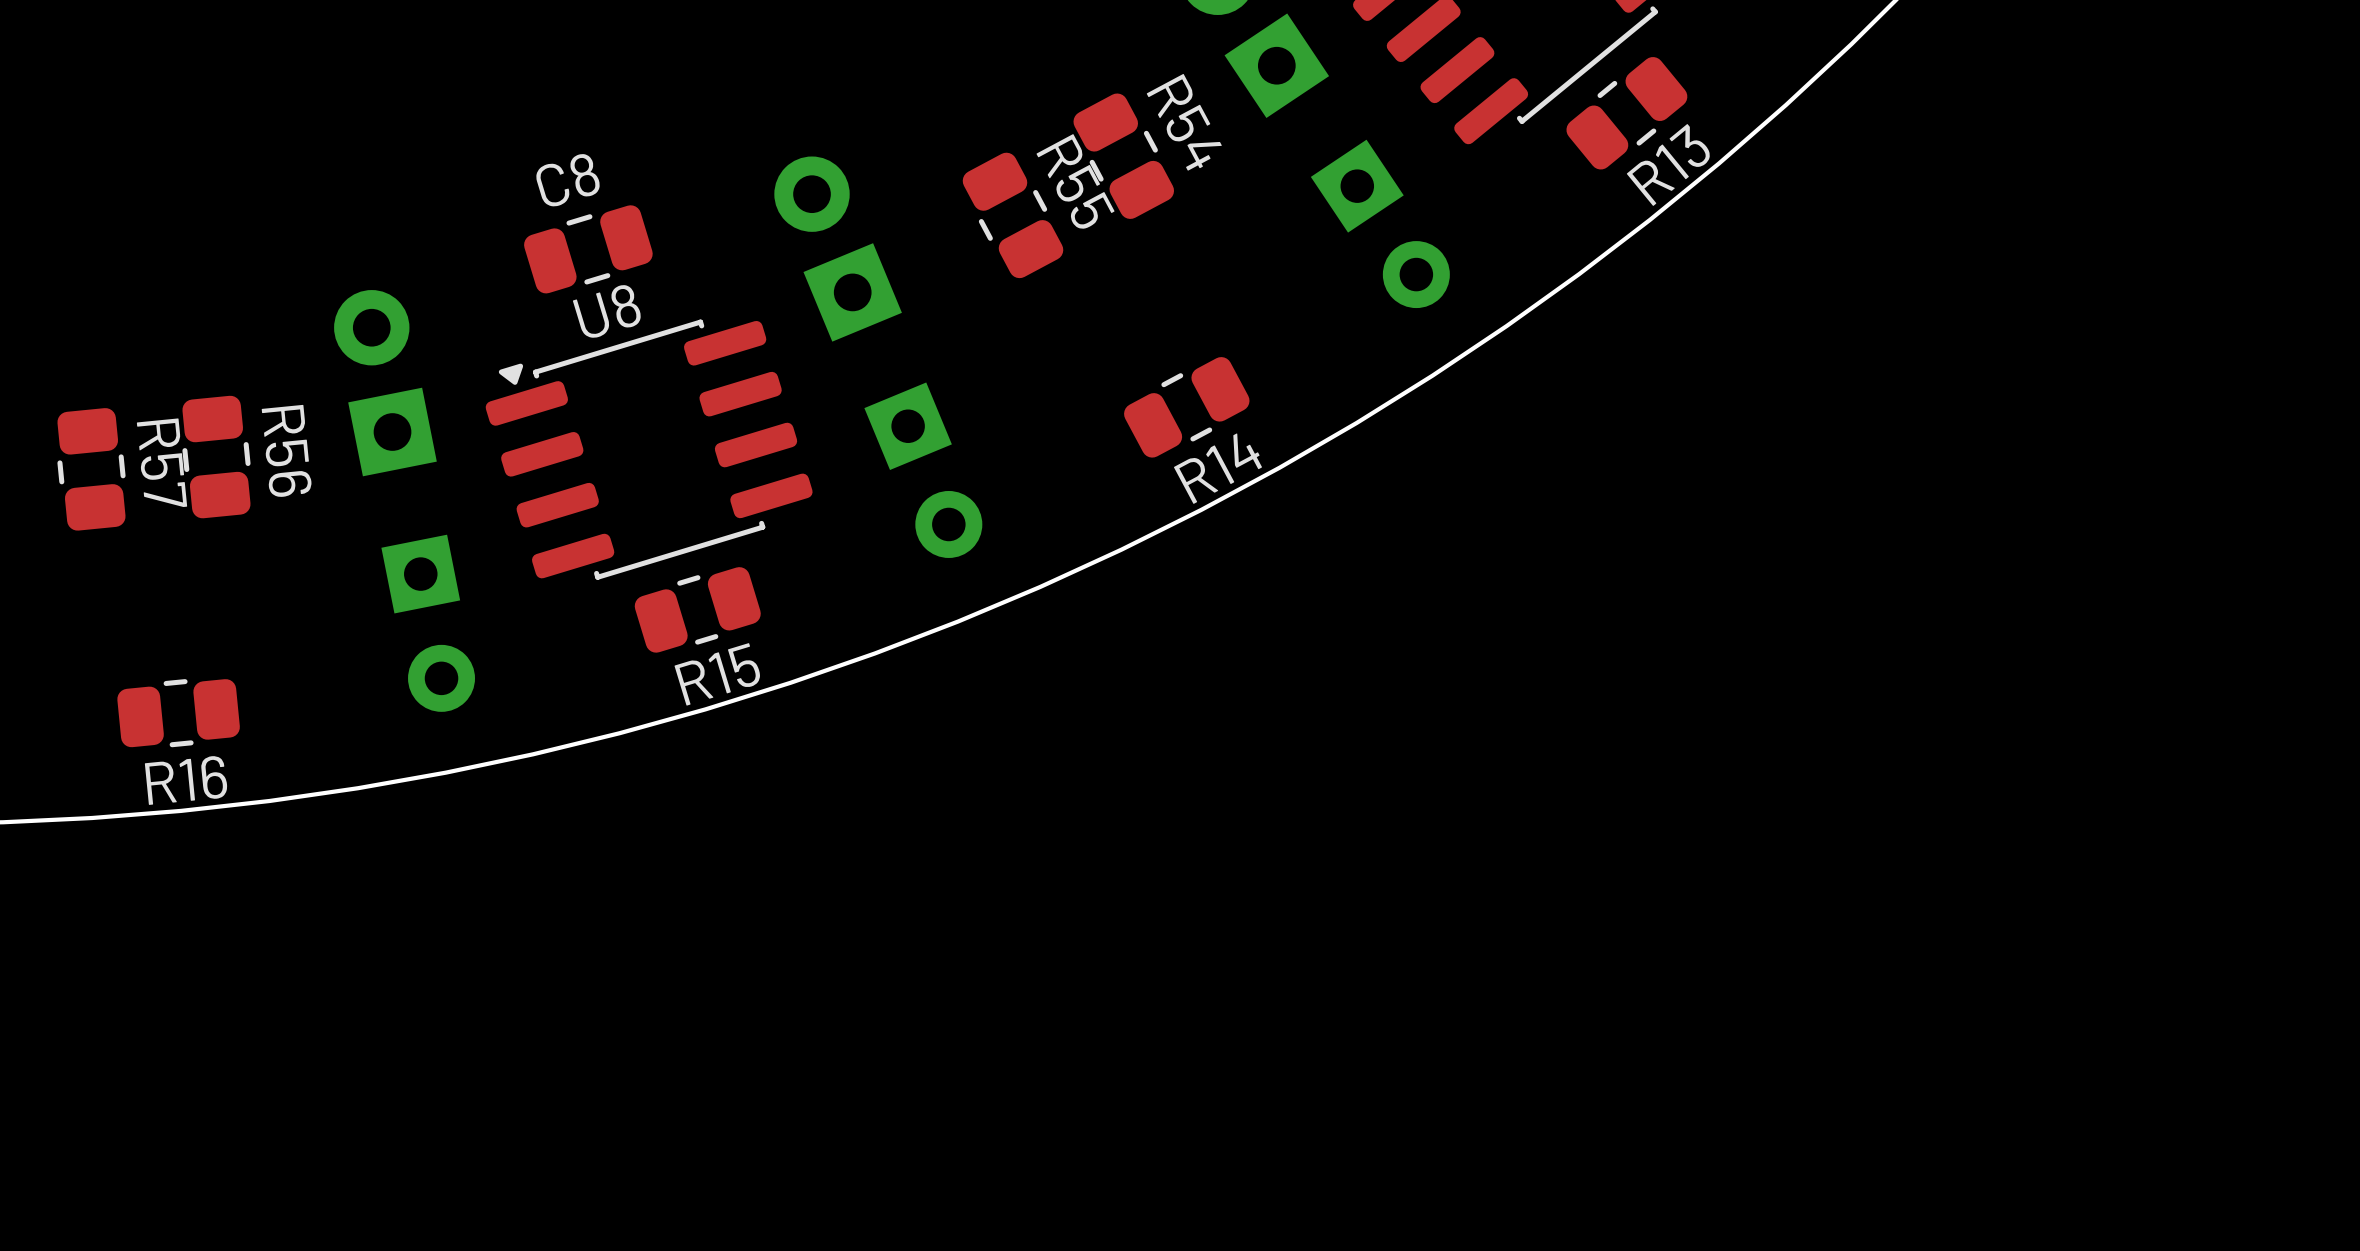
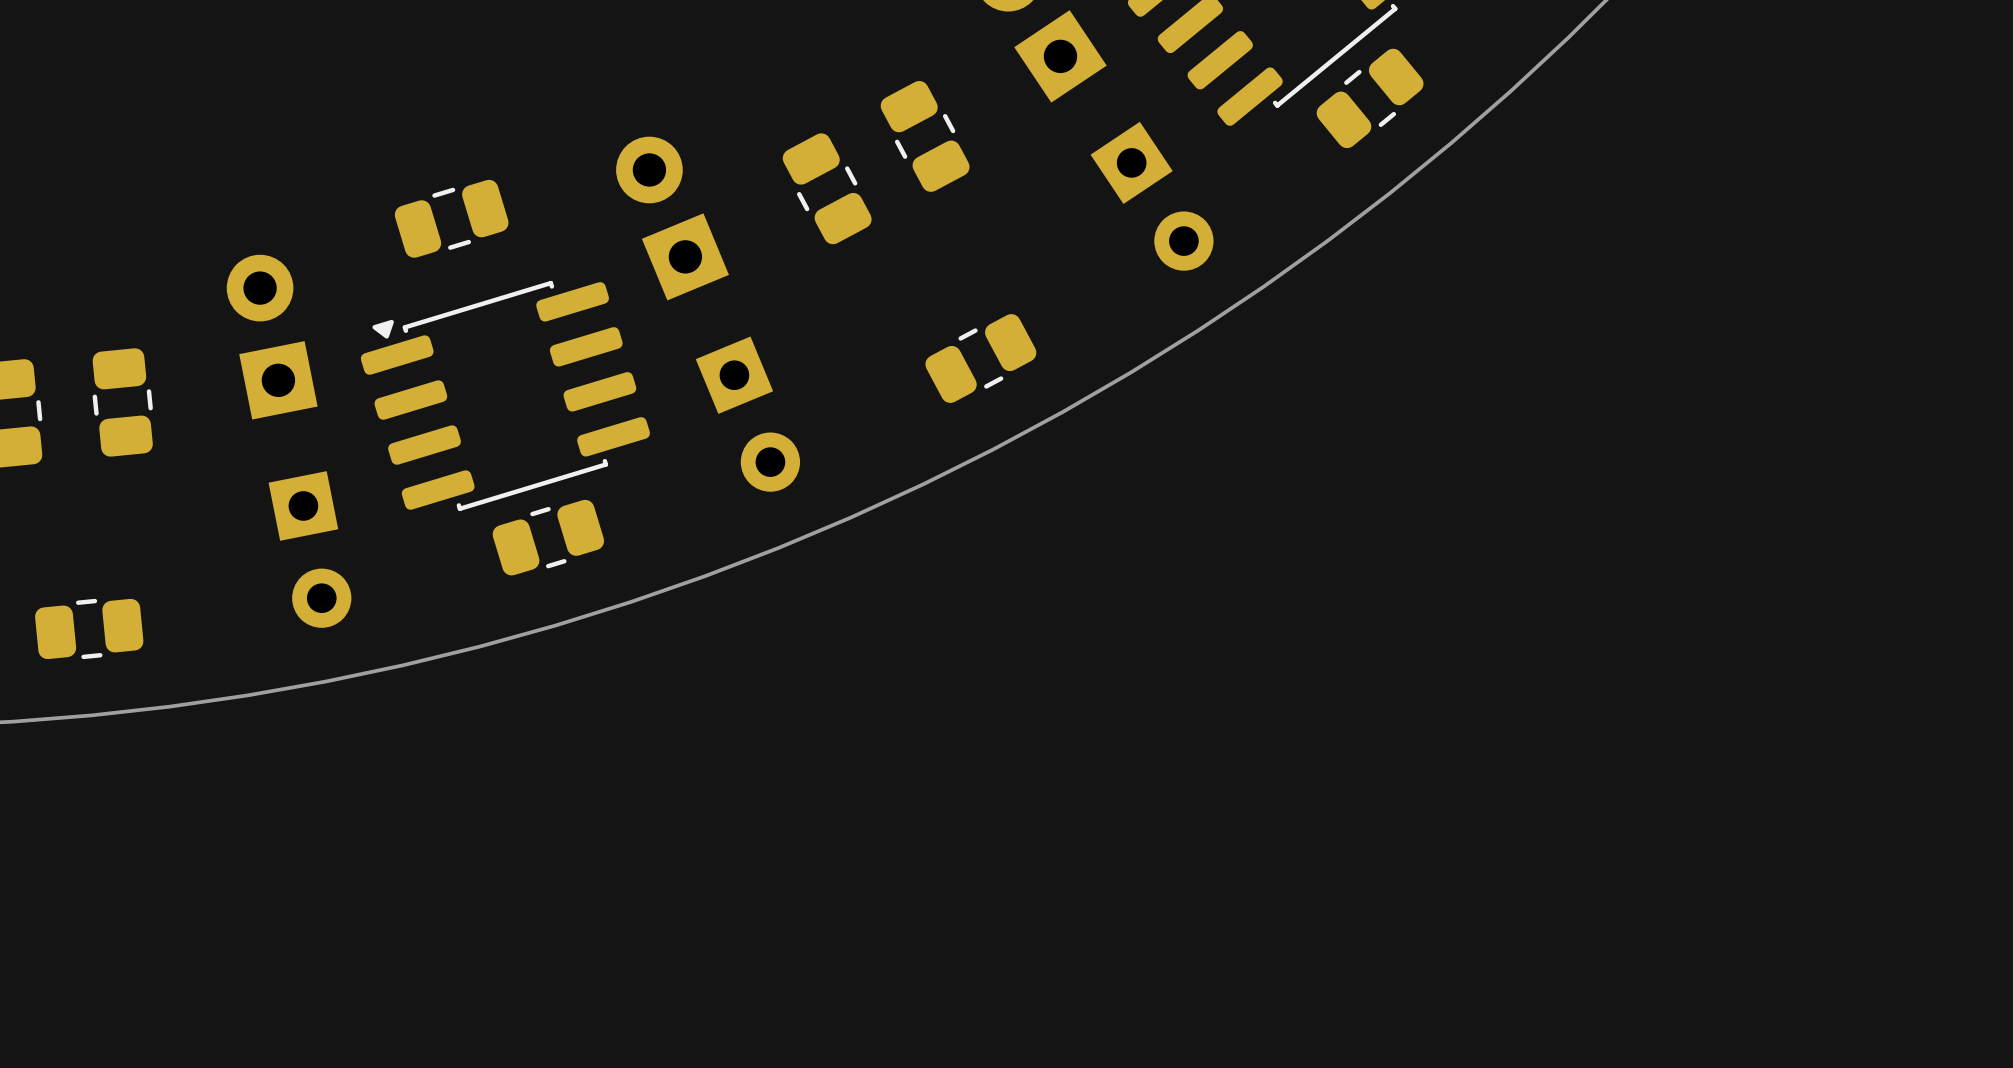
R54 name: R54 (1184, 122) -> none
R13 name: R13 (1668, 164) -> none
C8 name: C8 (568, 180) -> none
R55 name: R55 (1075, 181) -> none
U8 name: U8 (606, 311) -> none
R56 name: R56 (286, 450) -> none
R57 name: R57 (162, 462) -> none
R14 name: R14 (1217, 468) -> none
R15 name: R15 (717, 674) -> none
R16 name: R16 (186, 780) -> none

